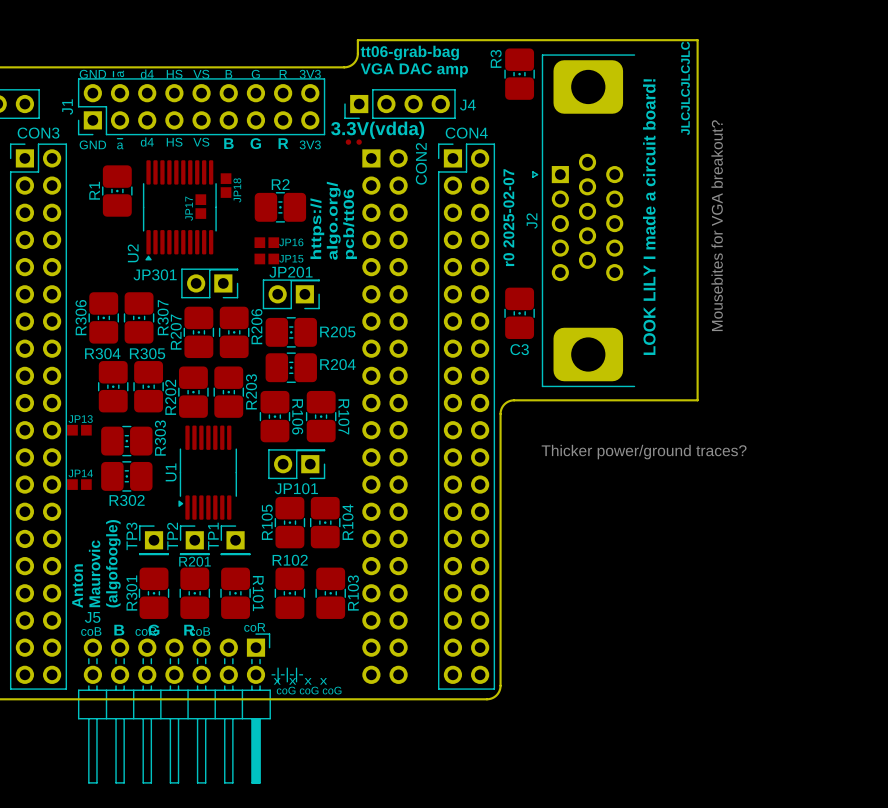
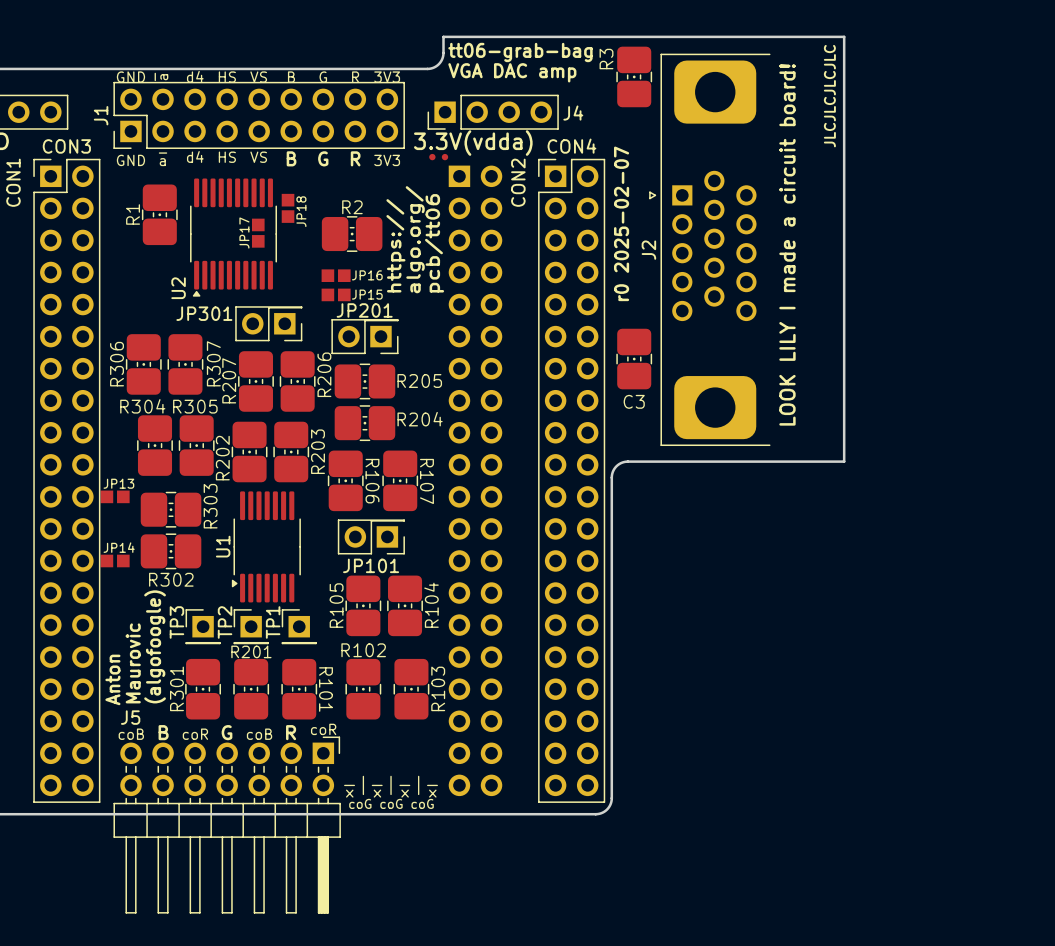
text: Mousebites for VGA breakout? (717, 225) -> none
text: Thicker power/ground traces? (644, 452) -> none

